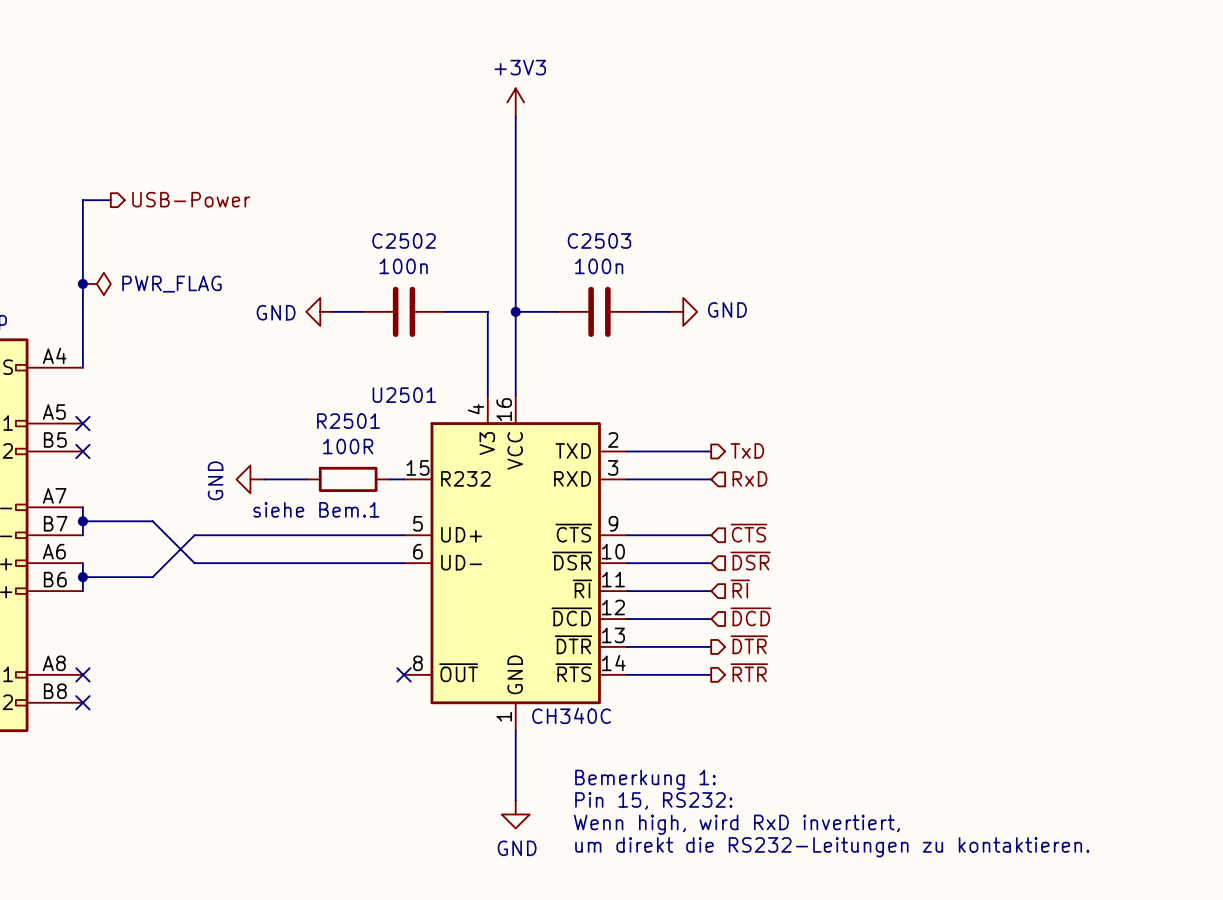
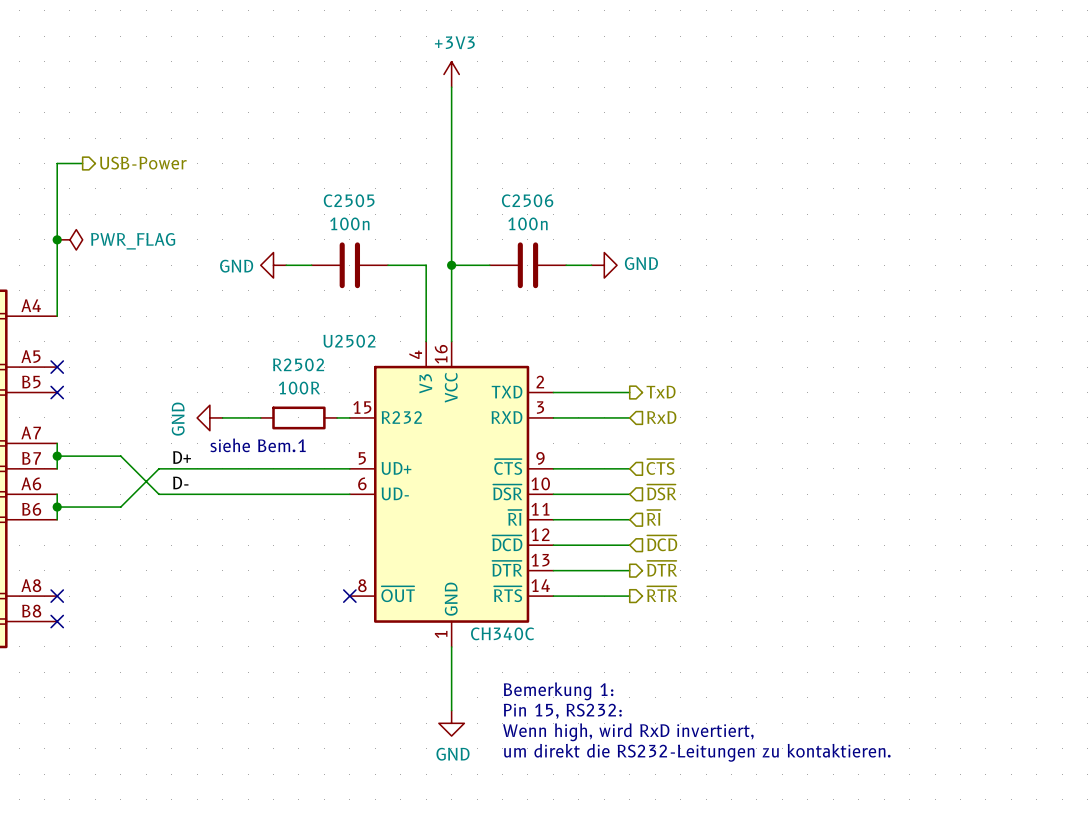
C2502 name: C2502 (404, 240) -> C2505 (349, 200)
C2503 name: C2503 (599, 240) -> C2506 (527, 200)
U2501 name: U2501 (404, 395) -> U2502 (349, 341)
R2501 name: R2501 (348, 421) -> R2502 (298, 364)
label: none -> D+ (182, 457)
label: none -> D- (180, 482)

